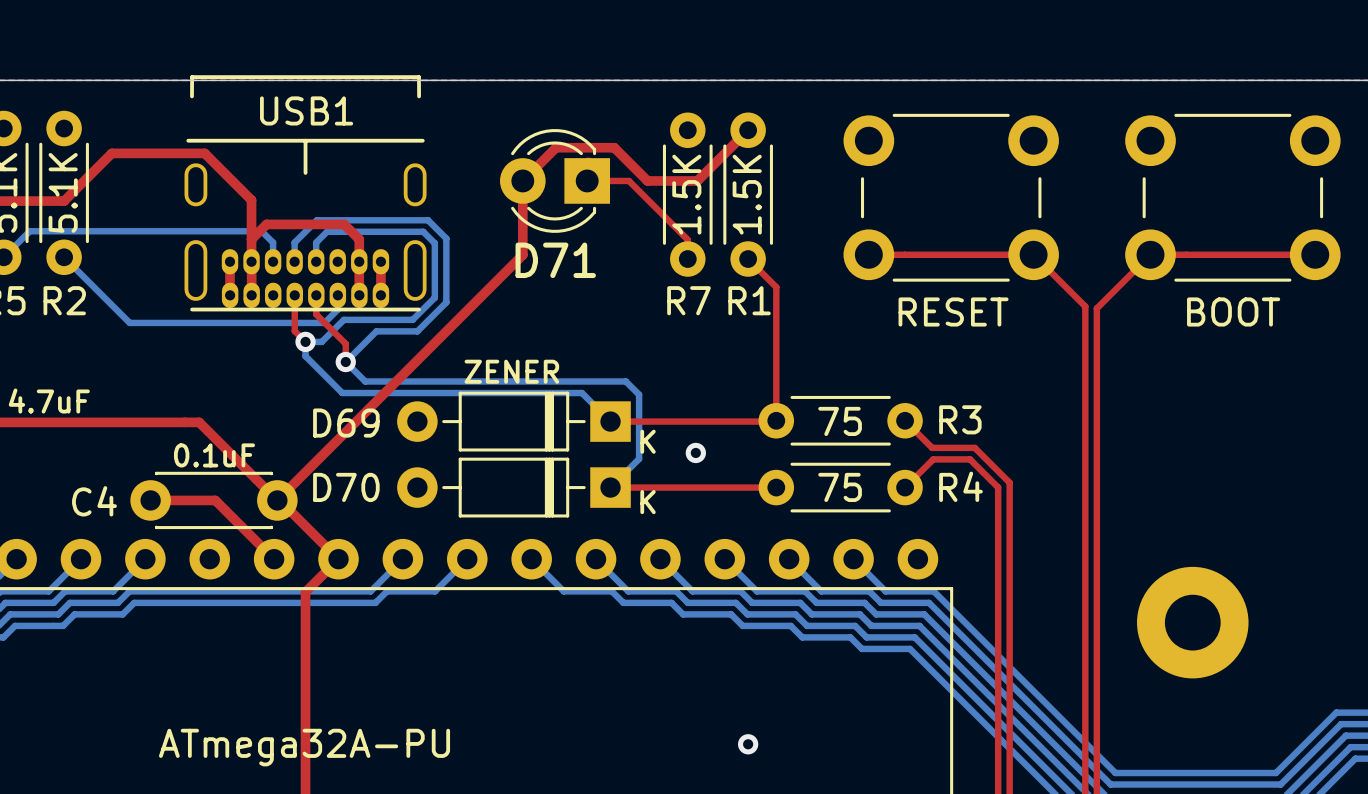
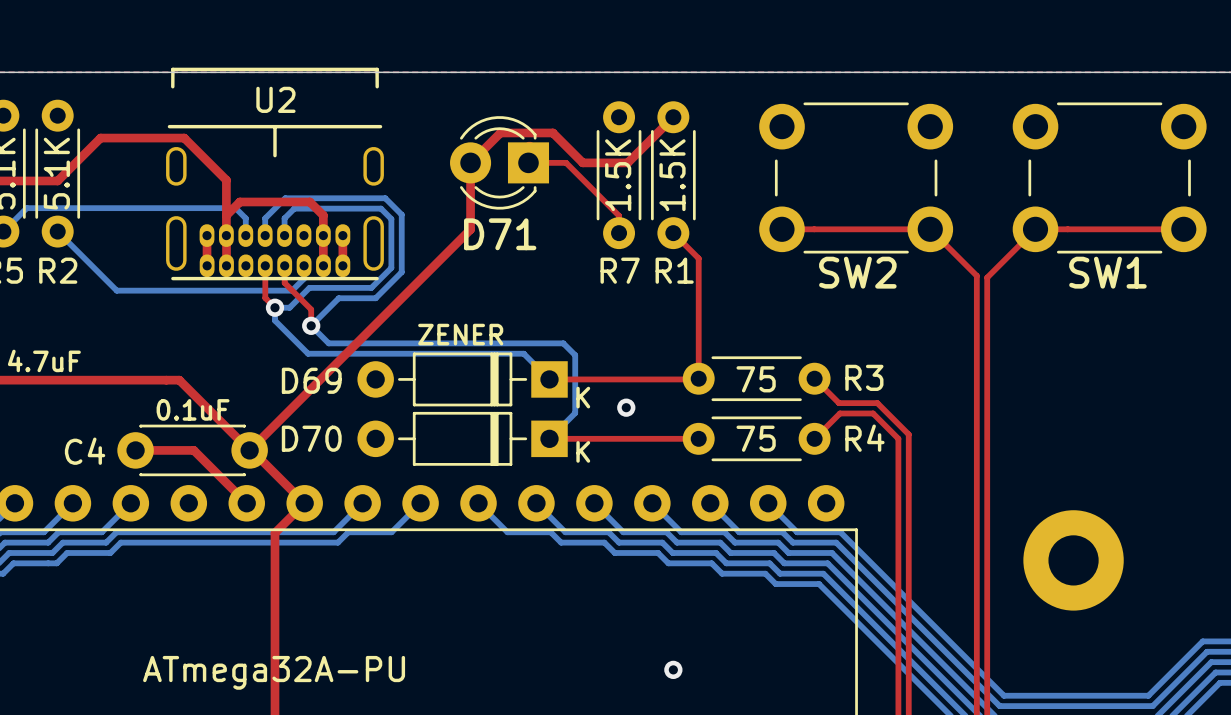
USB1 name: USB1 (306, 110) -> U2 (275, 99)
SW2 name: none -> SW2 (857, 272)
SW1 name: none -> SW1 (1107, 272)
SW2 value: RESET (953, 311) -> none
SW1 value: BOOT (1233, 311) -> none

